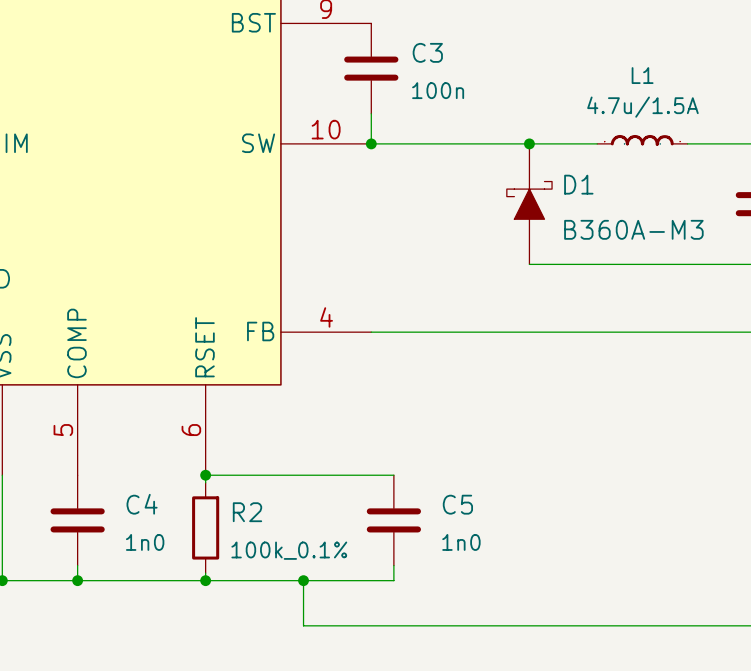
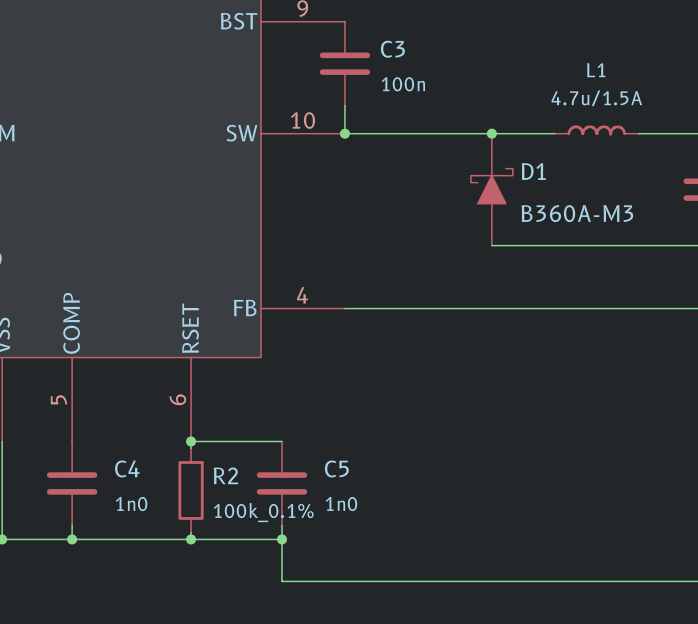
wire: (303, 475) (393, 475) -> none
C5 position: (393, 520) -> (281, 483)
wire: (393, 565) (393, 580) (303, 580) -> (281, 525) (281, 539)

